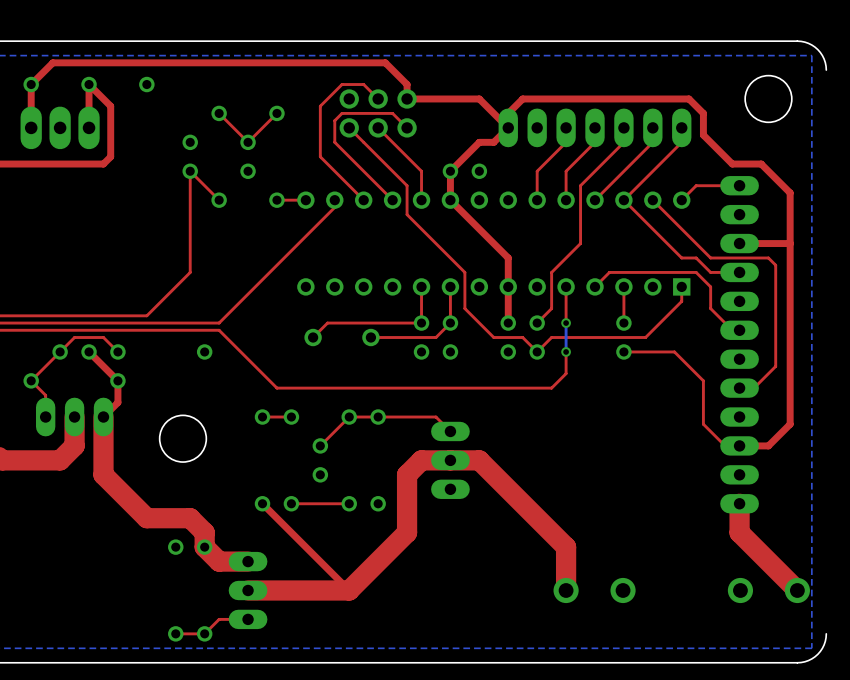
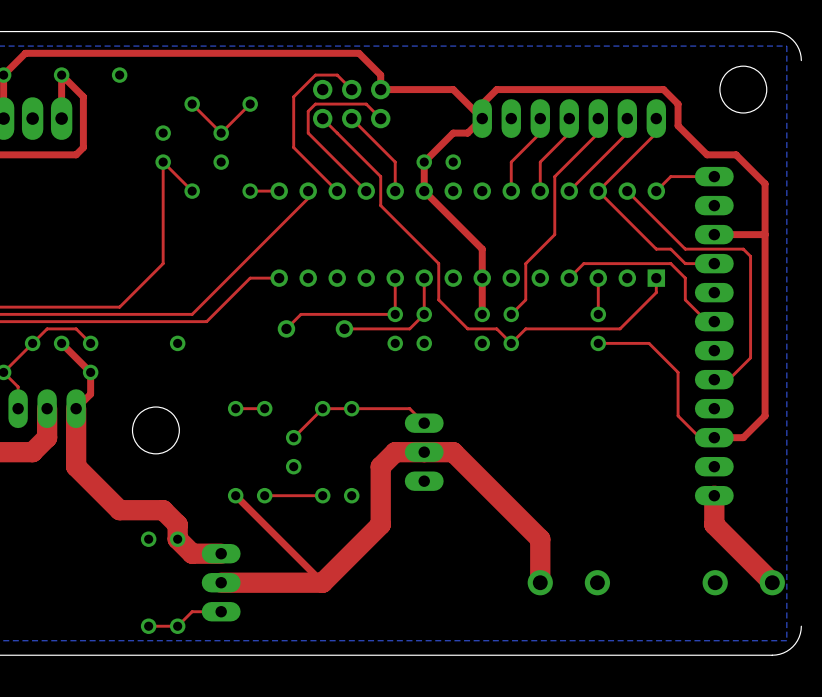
top track: (566, 286) (566, 323) -> none
bottom track: (566, 323) (566, 351) -> none
via: (566, 323) -> none
top track: (219, 330) (276, 388) (551, 388) (566, 373) (566, 351) -> (192, 321) (206, 321) (250, 278) (279, 278)
via: (566, 351) -> none

